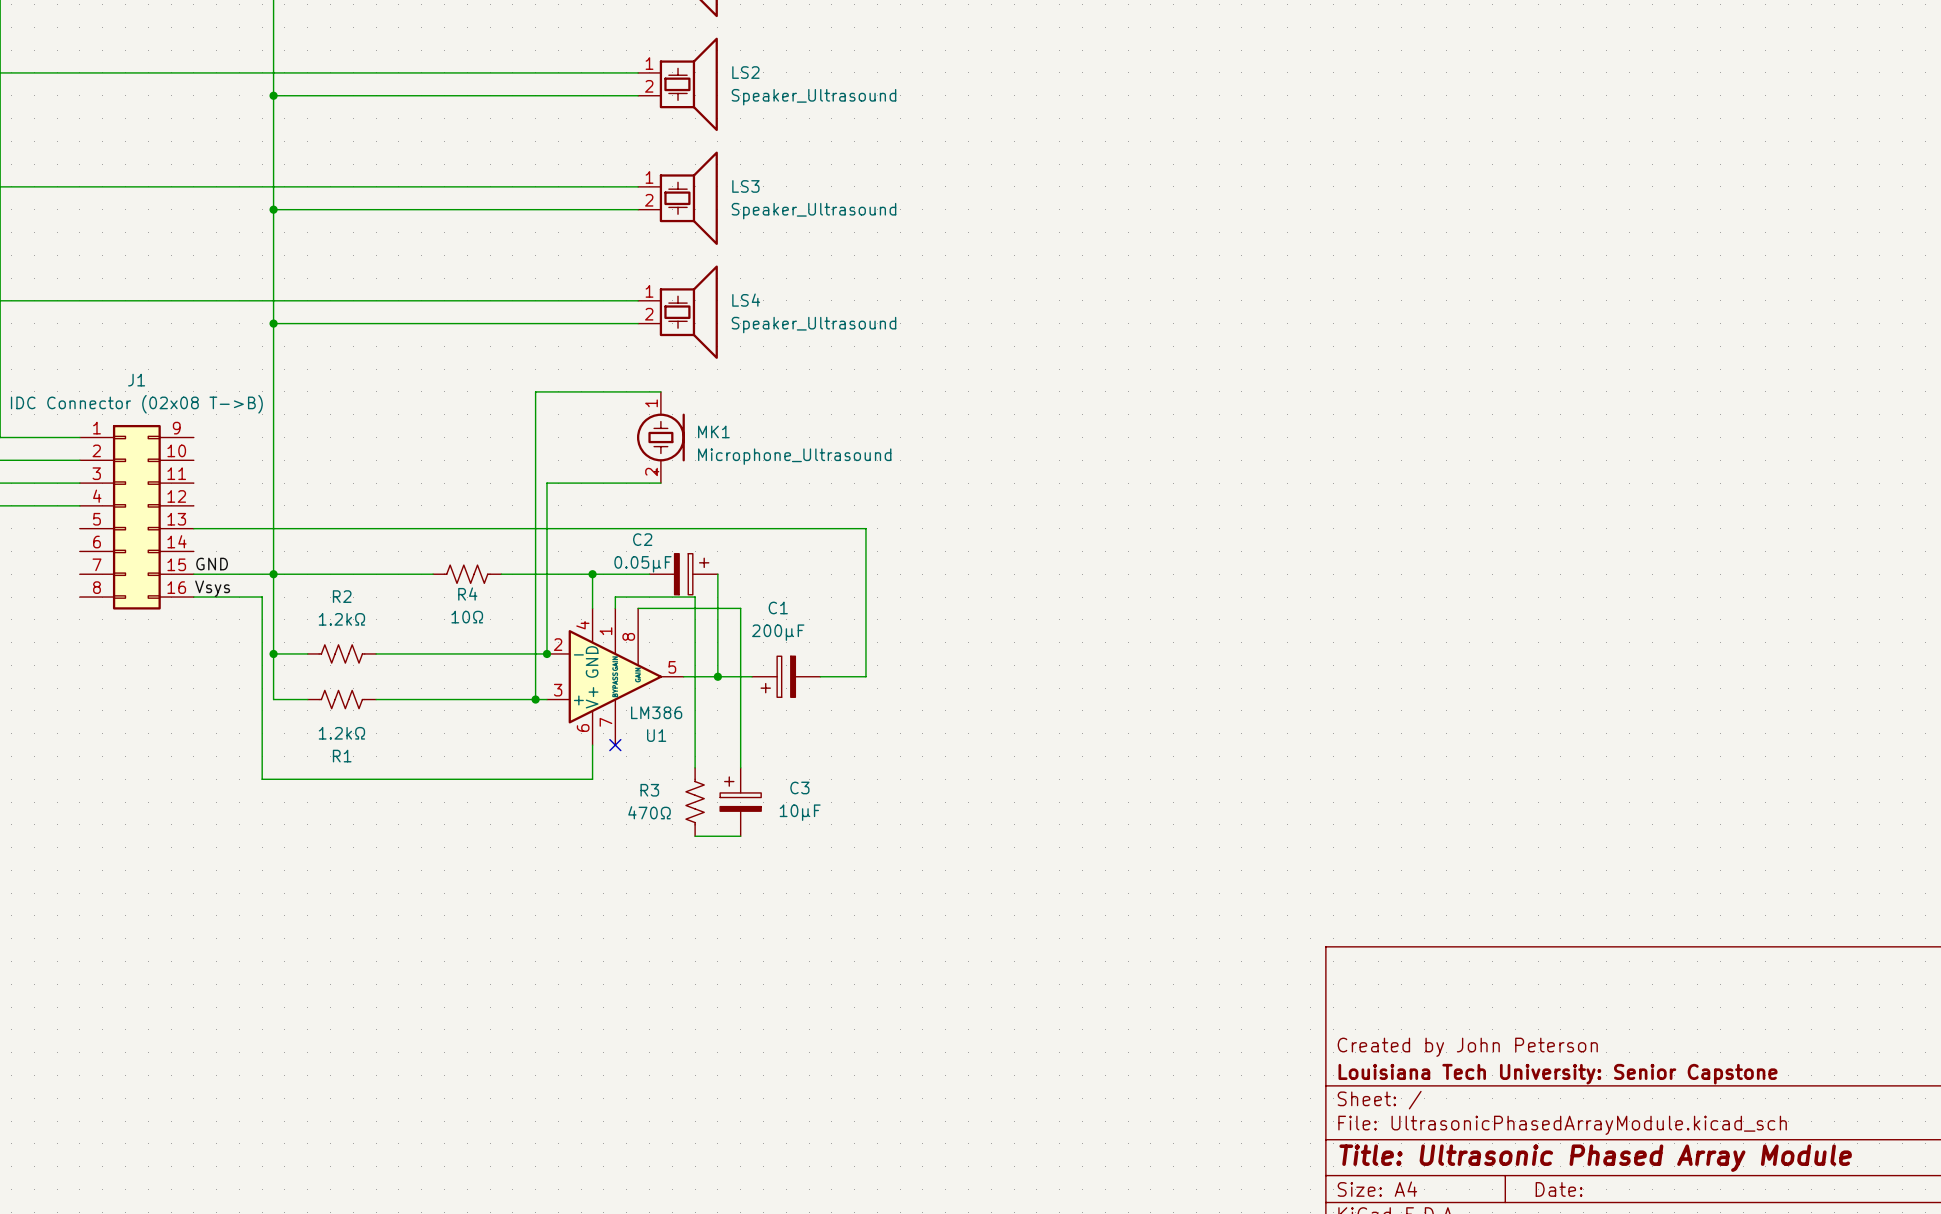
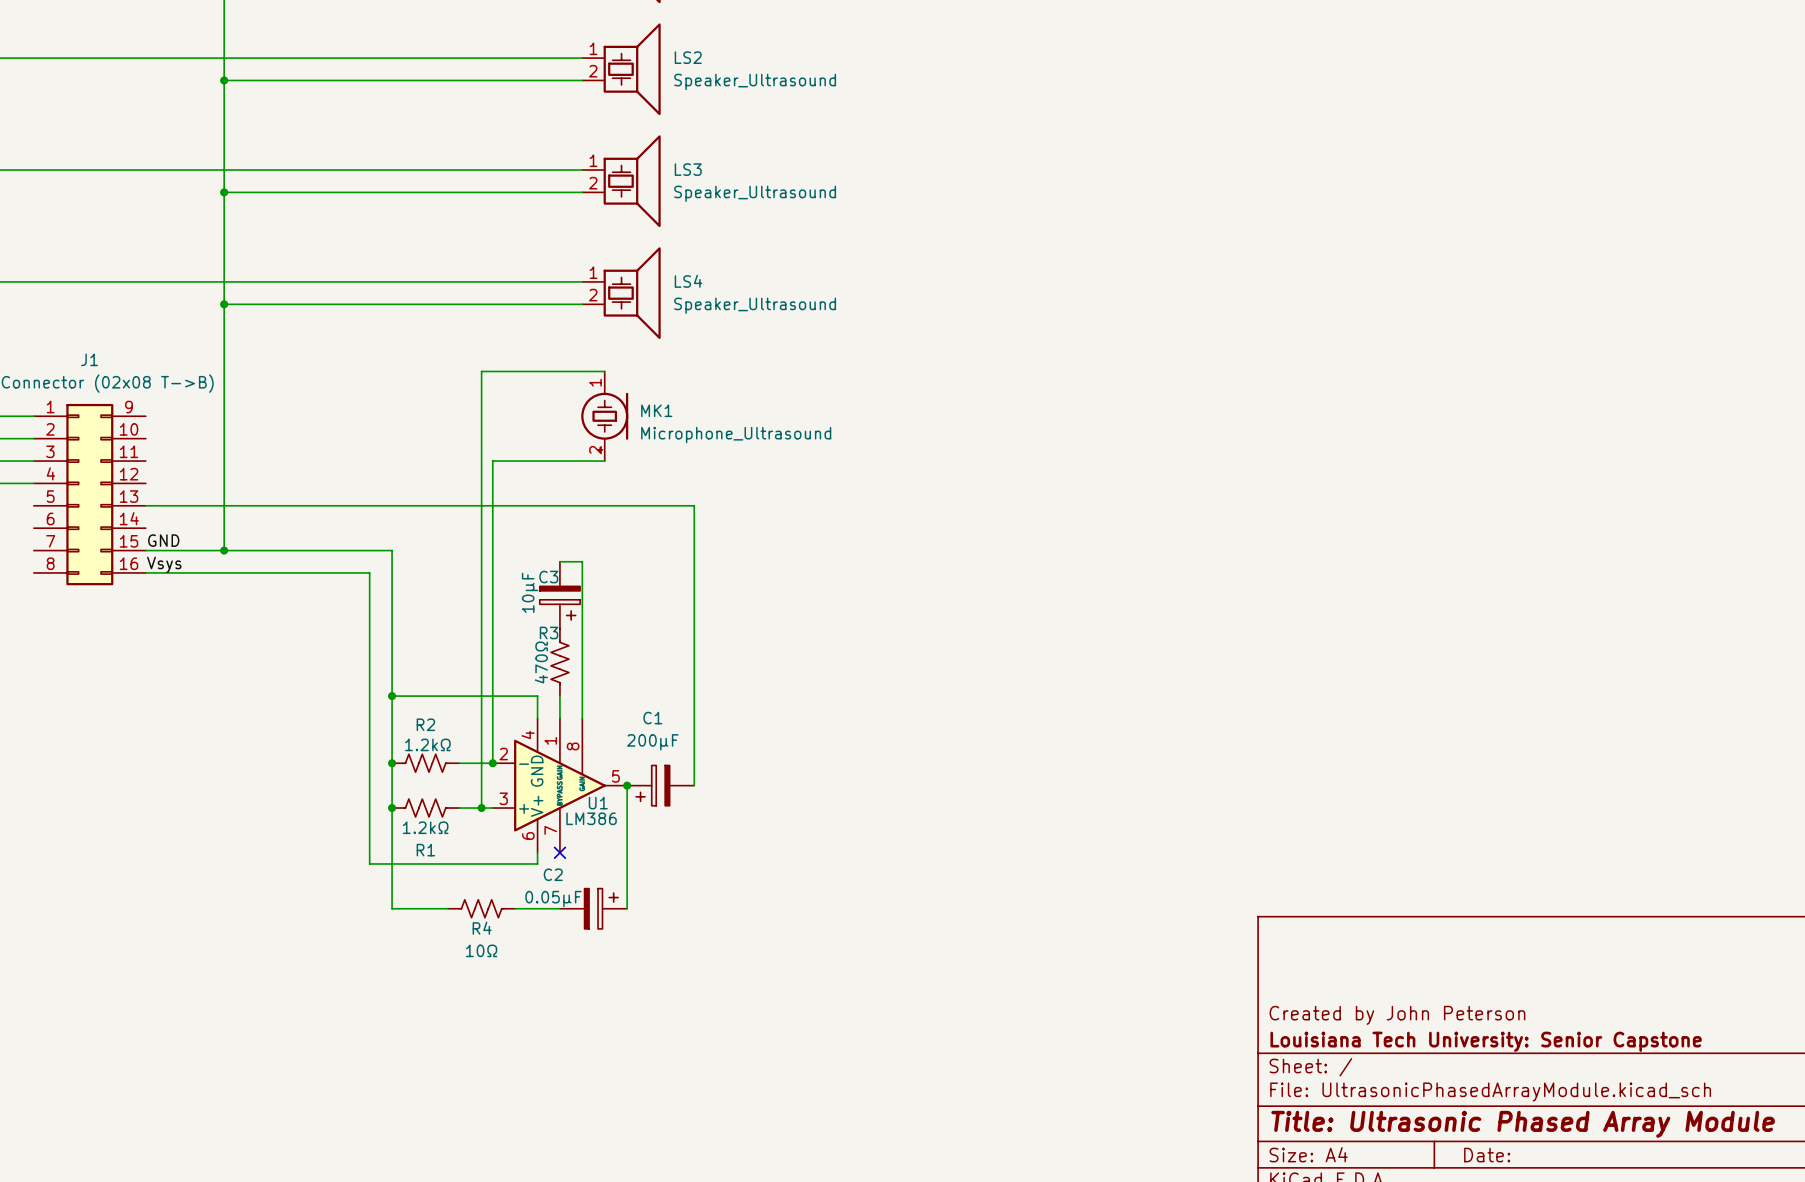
wire: (752, 528) (865, 528) (865, 676) (820, 676) -> (694, 505) (694, 785)
wire: (273, 574) (273, 699) (307, 699) -> none
wire: none -> (380, 550) (392, 550) (392, 908) (448, 908)
R4 position: (467, 574) -> (481, 908)
wire: (501, 574) (649, 574) -> none
wire: (592, 574) (592, 608) -> none
junction: (592, 574) -> none
C2 position: (683, 574) -> (593, 908)
wire: (717, 574) (717, 676) -> none
wire: none -> (559, 561) (582, 561) (582, 718)
R2 name position: R2 (342, 596) -> R2 (425, 724)
wire: (262, 597) (262, 779) (592, 779) (592, 745) -> (212, 572) (369, 572) (369, 863) (537, 863) (537, 852)
wire: (615, 608) (615, 597) (695, 597) (695, 767) -> none
wire: (638, 608) (740, 608) (740, 767) -> none
R2 value position: 1.2kΩ (341, 619) -> 1.2kΩ (427, 744)
wire: (273, 653) (307, 653) -> none
junction: (273, 653) -> none
R2 position: (341, 653) -> (425, 763)
wire: (376, 653) (546, 653) -> (459, 763) (492, 763) (492, 628)
junction: (546, 653) -> none
U1 position: (615, 676) -> (559, 785)
wire: (683, 676) (752, 676) -> none
junction: (717, 676) -> none
C1 position: (786, 676) -> (660, 785)
R1 position: (341, 699) -> (425, 808)
wire: (376, 699) (546, 699) -> none
wire: none -> (481, 673) (481, 808)
junction: (535, 699) -> none
U1 value position: LM386 (656, 712) -> LM386 (591, 818)
wire: none -> (392, 696) (537, 696) (537, 718)
junction: none -> (392, 696)
R1 value position: 1.2kΩ (341, 733) -> 1.2kΩ (425, 827)
U1 name position: U1 (656, 735) -> U1 (598, 803)
no-connect mark: (615, 745) -> none
R1 name position: R1 (342, 756) -> R1 (425, 850)
C3 name position: C3 (799, 787) -> C3 (548, 577)
junction: none -> (392, 763)
junction: none -> (492, 763)
R3 name position: R3 (649, 790) -> R3 (549, 632)
C3 rotation: 0° (740, 794) -> 180° (559, 603)
R3 position: (695, 802) -> (559, 662)
C3 position: (740, 802) -> (559, 595)
R3 value rotation: 0° (649, 812) -> 90° counterclockwise (541, 662)
C3 value position: 10μF (800, 812) -> 10μF (530, 592)
wire: none -> (627, 785) (627, 908)
junction: none -> (627, 785)
junction: none -> (392, 808)
wire: none -> (459, 808) (492, 808)
junction: none -> (481, 808)
wire: (695, 836) (740, 836) -> (515, 908) (559, 908)
no-connect mark: none -> (559, 852)

